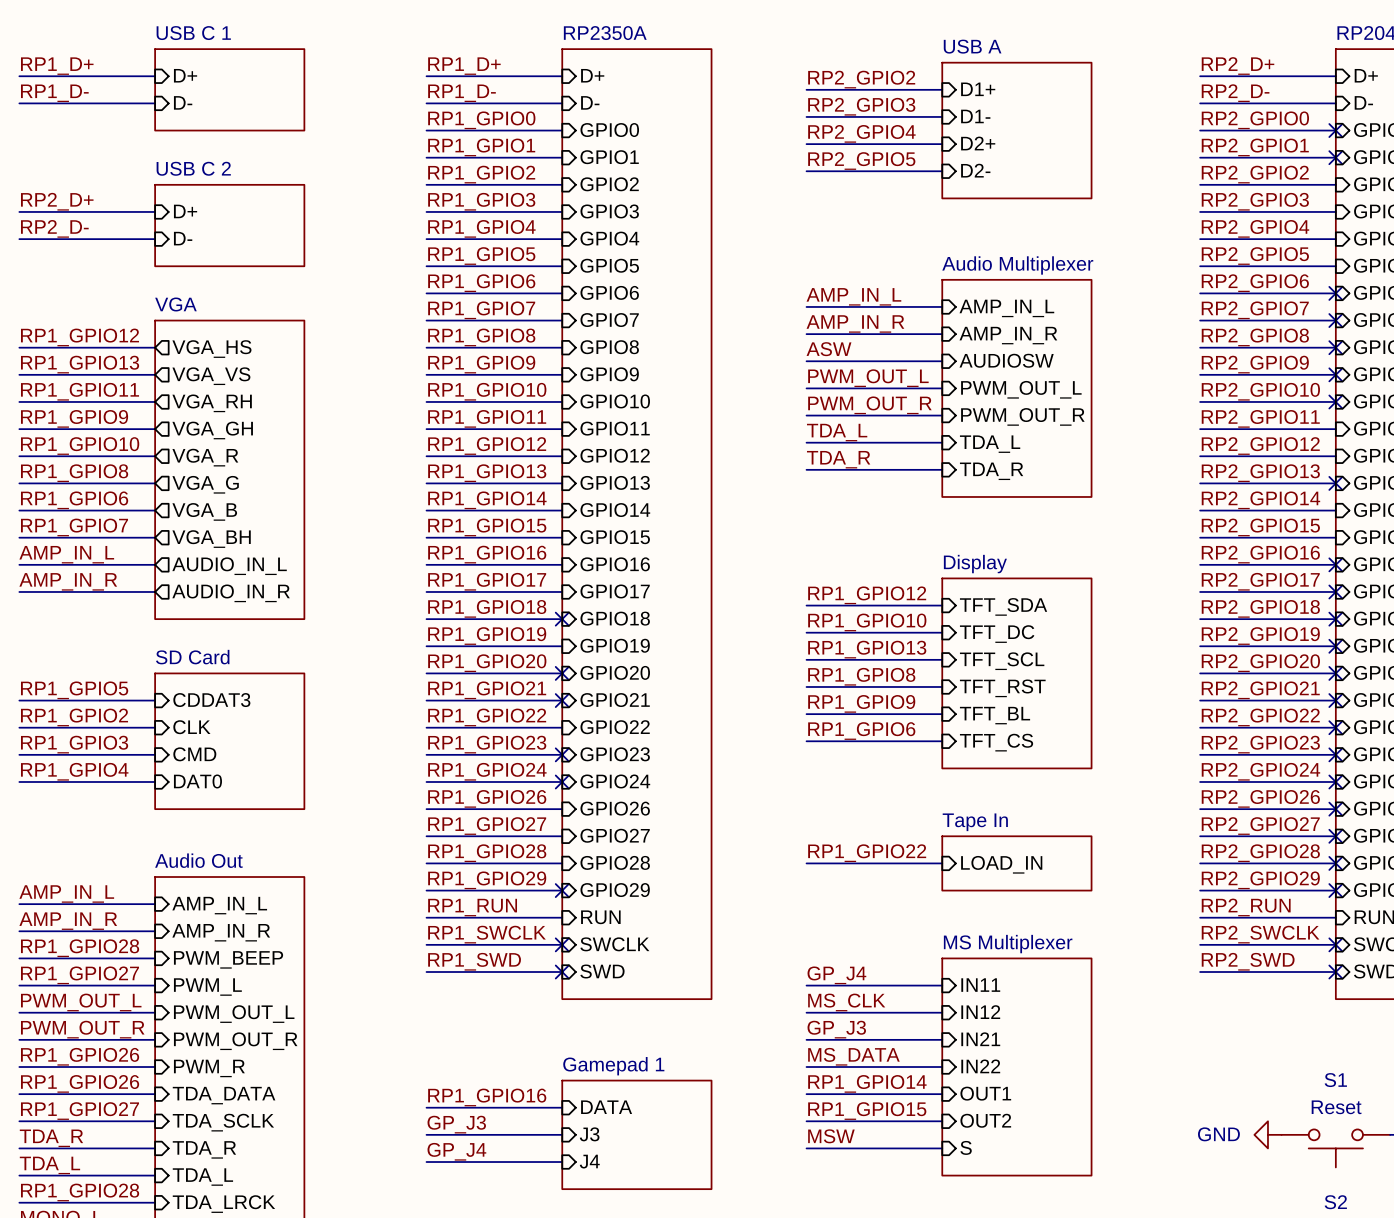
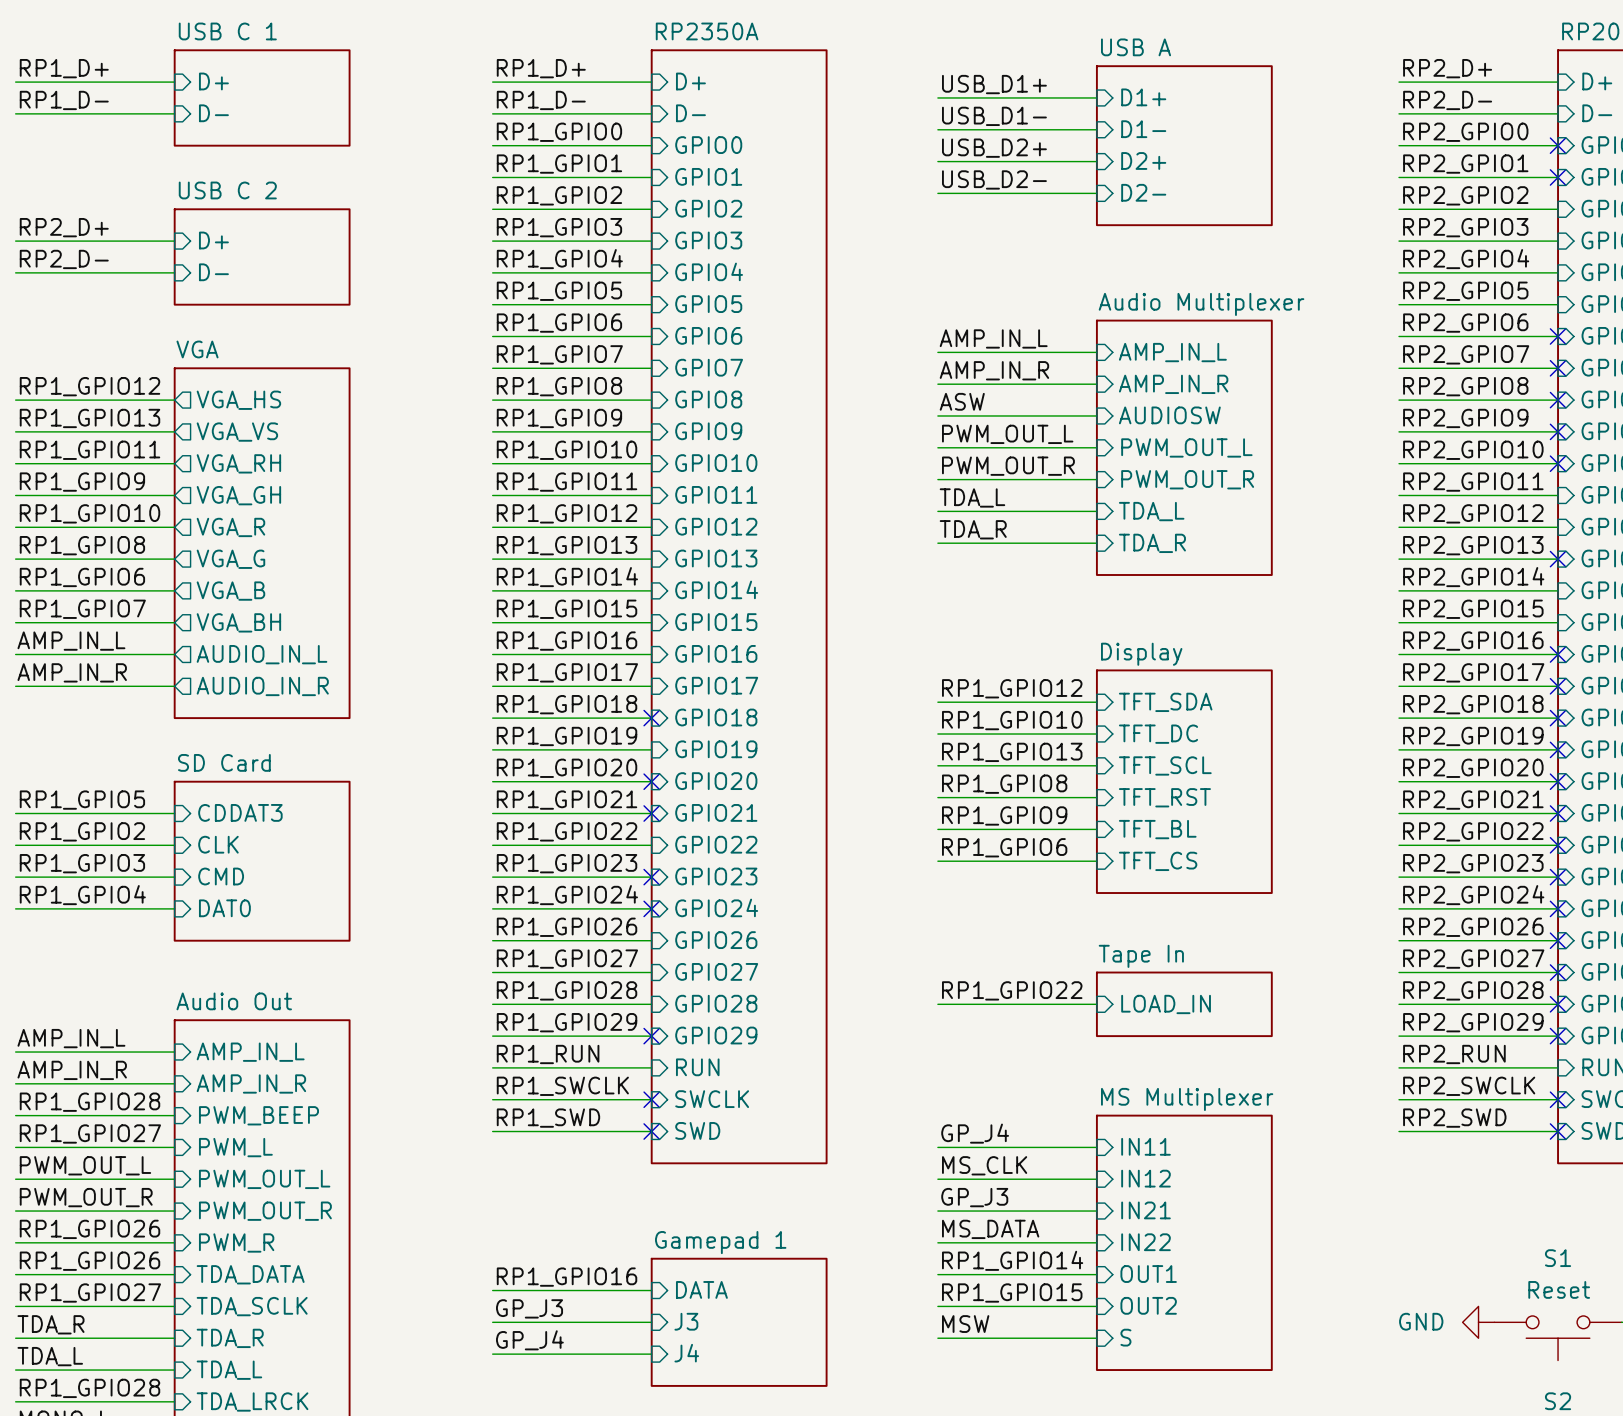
label: RP2_GPIO2 (861, 79) -> USB_D1+ (994, 84)
label: RP2_GPIO3 (861, 106) -> USB_D1- (994, 116)
label: RP2_GPIO4 (861, 133) -> USB_D2+ (994, 148)
label: RP2_GPIO5 (861, 161) -> USB_D2- (994, 179)

